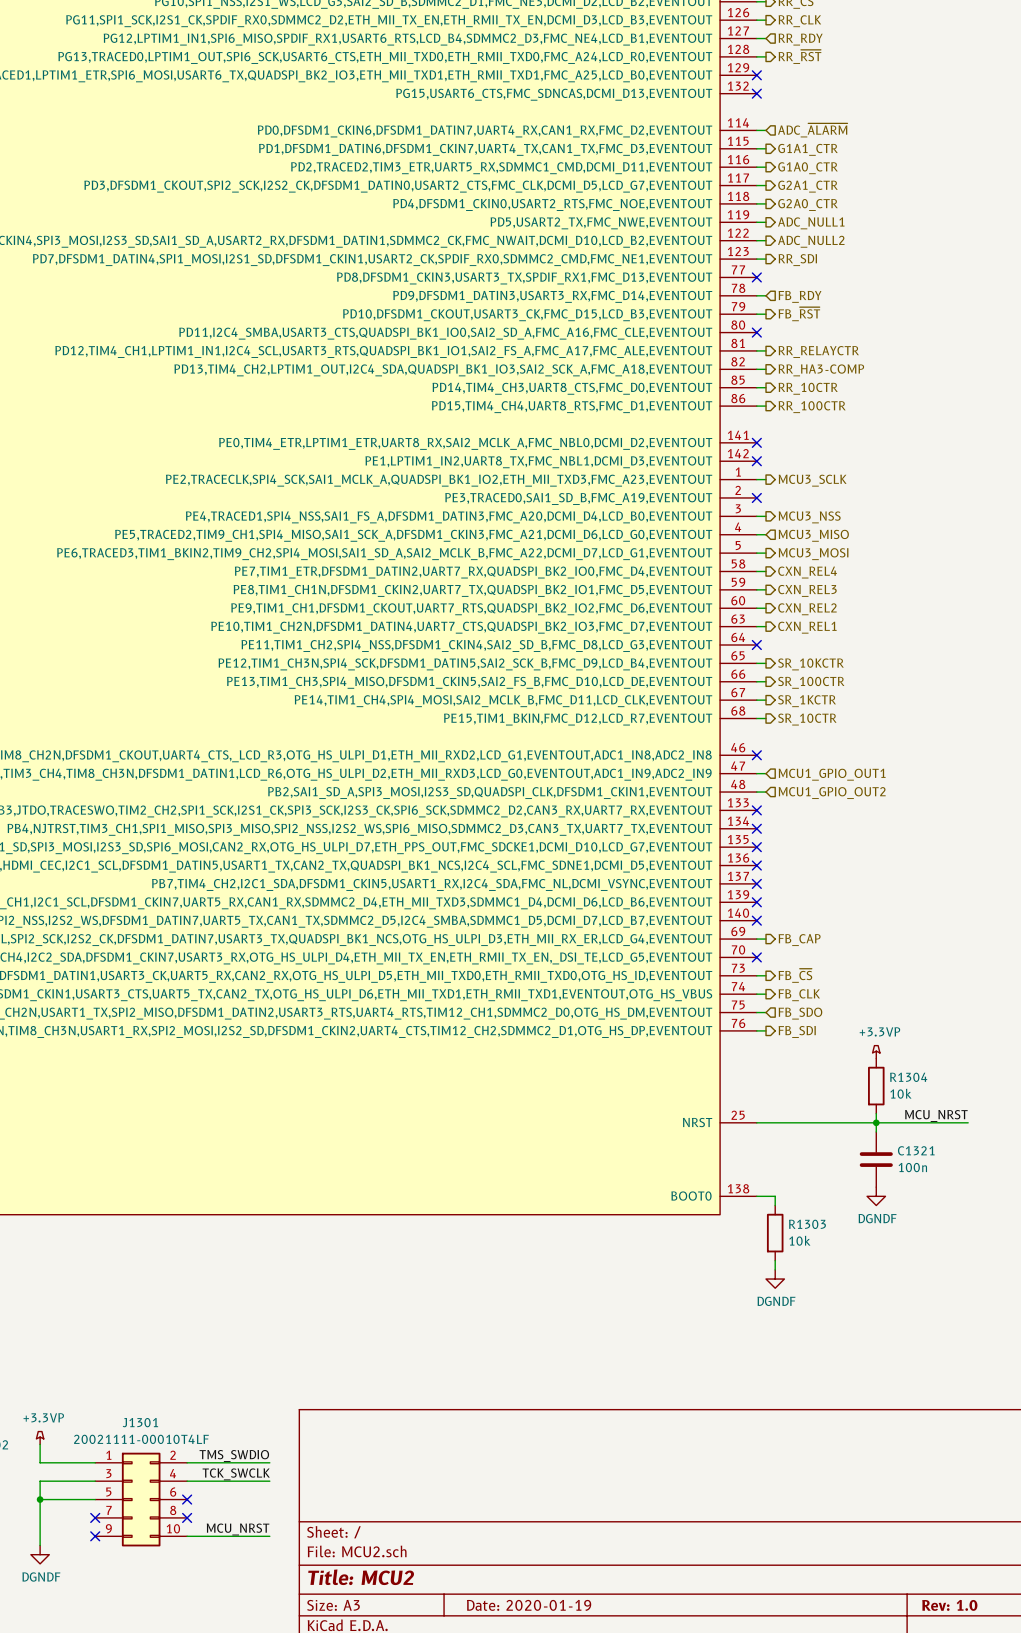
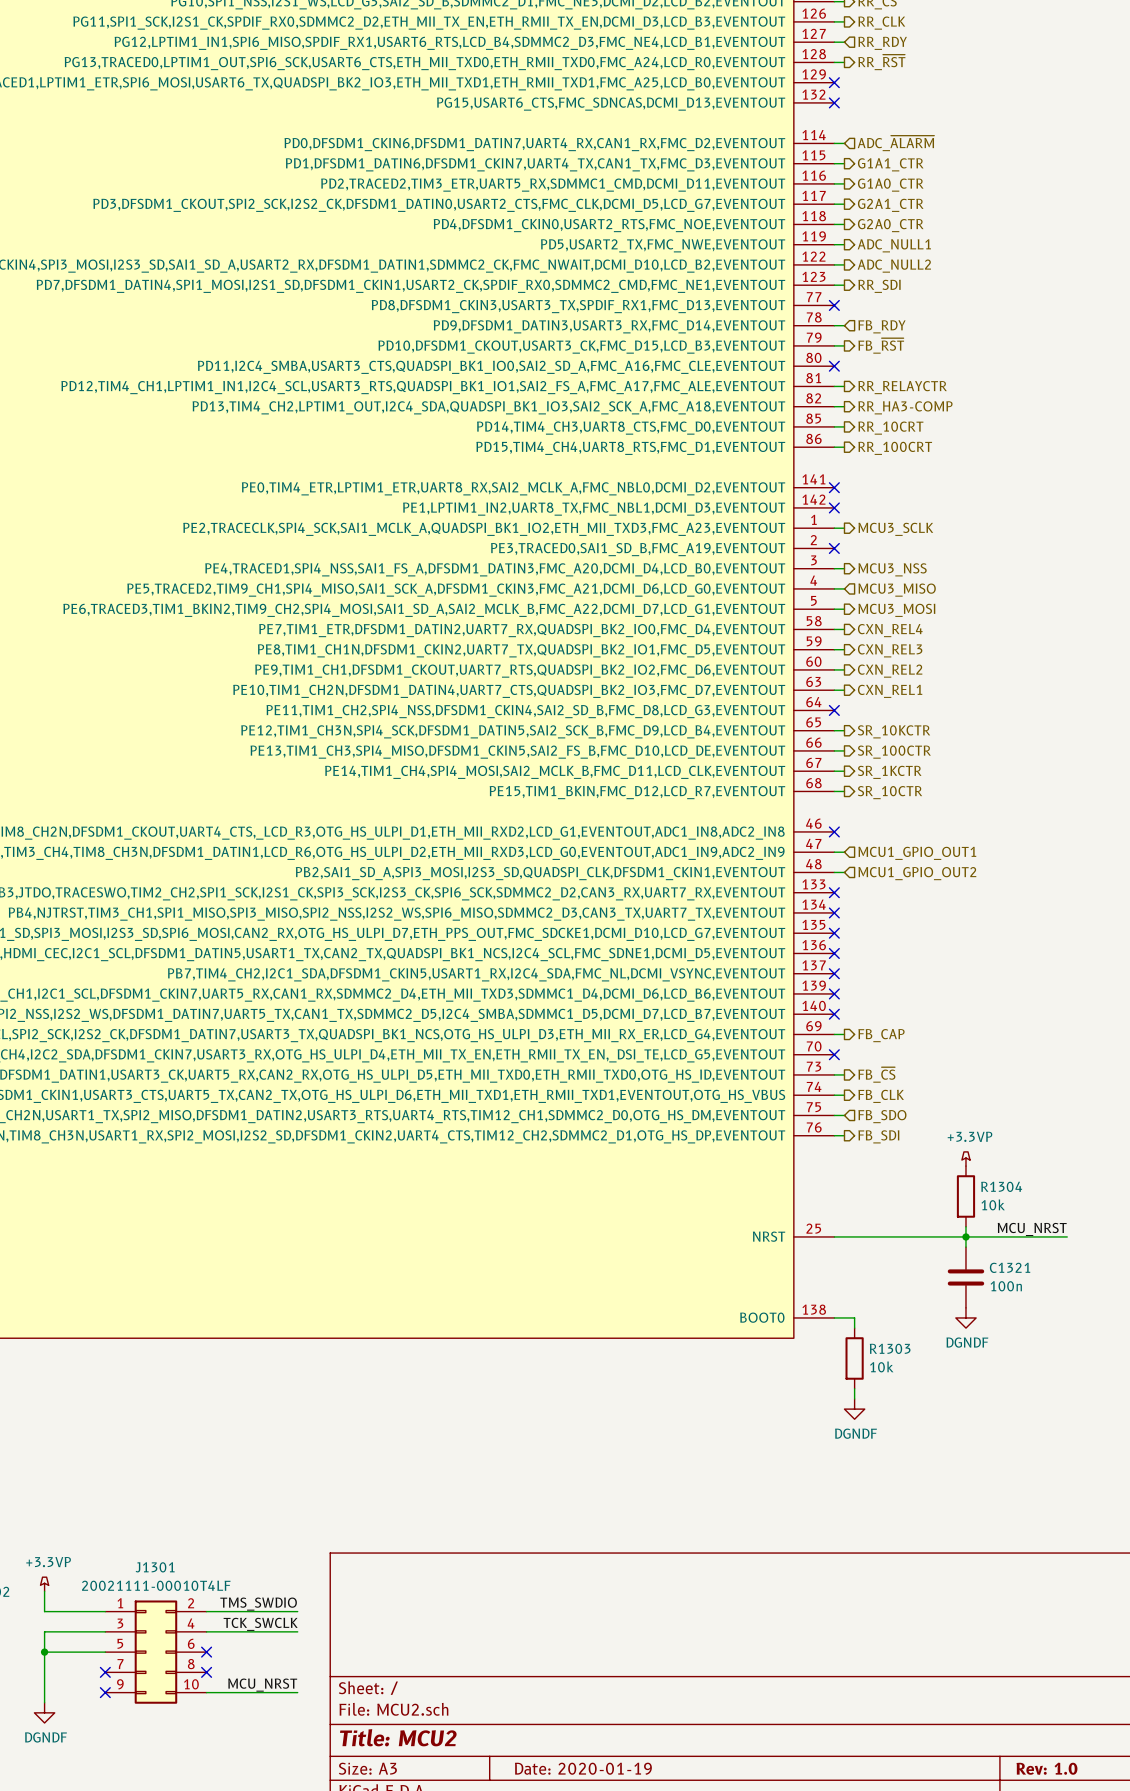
hierarchical label: RR_10CTR (808, 388) -> RR_10CRT (890, 428)
hierarchical label: RR_100CTR (812, 407) -> RR_100CRT (895, 448)

